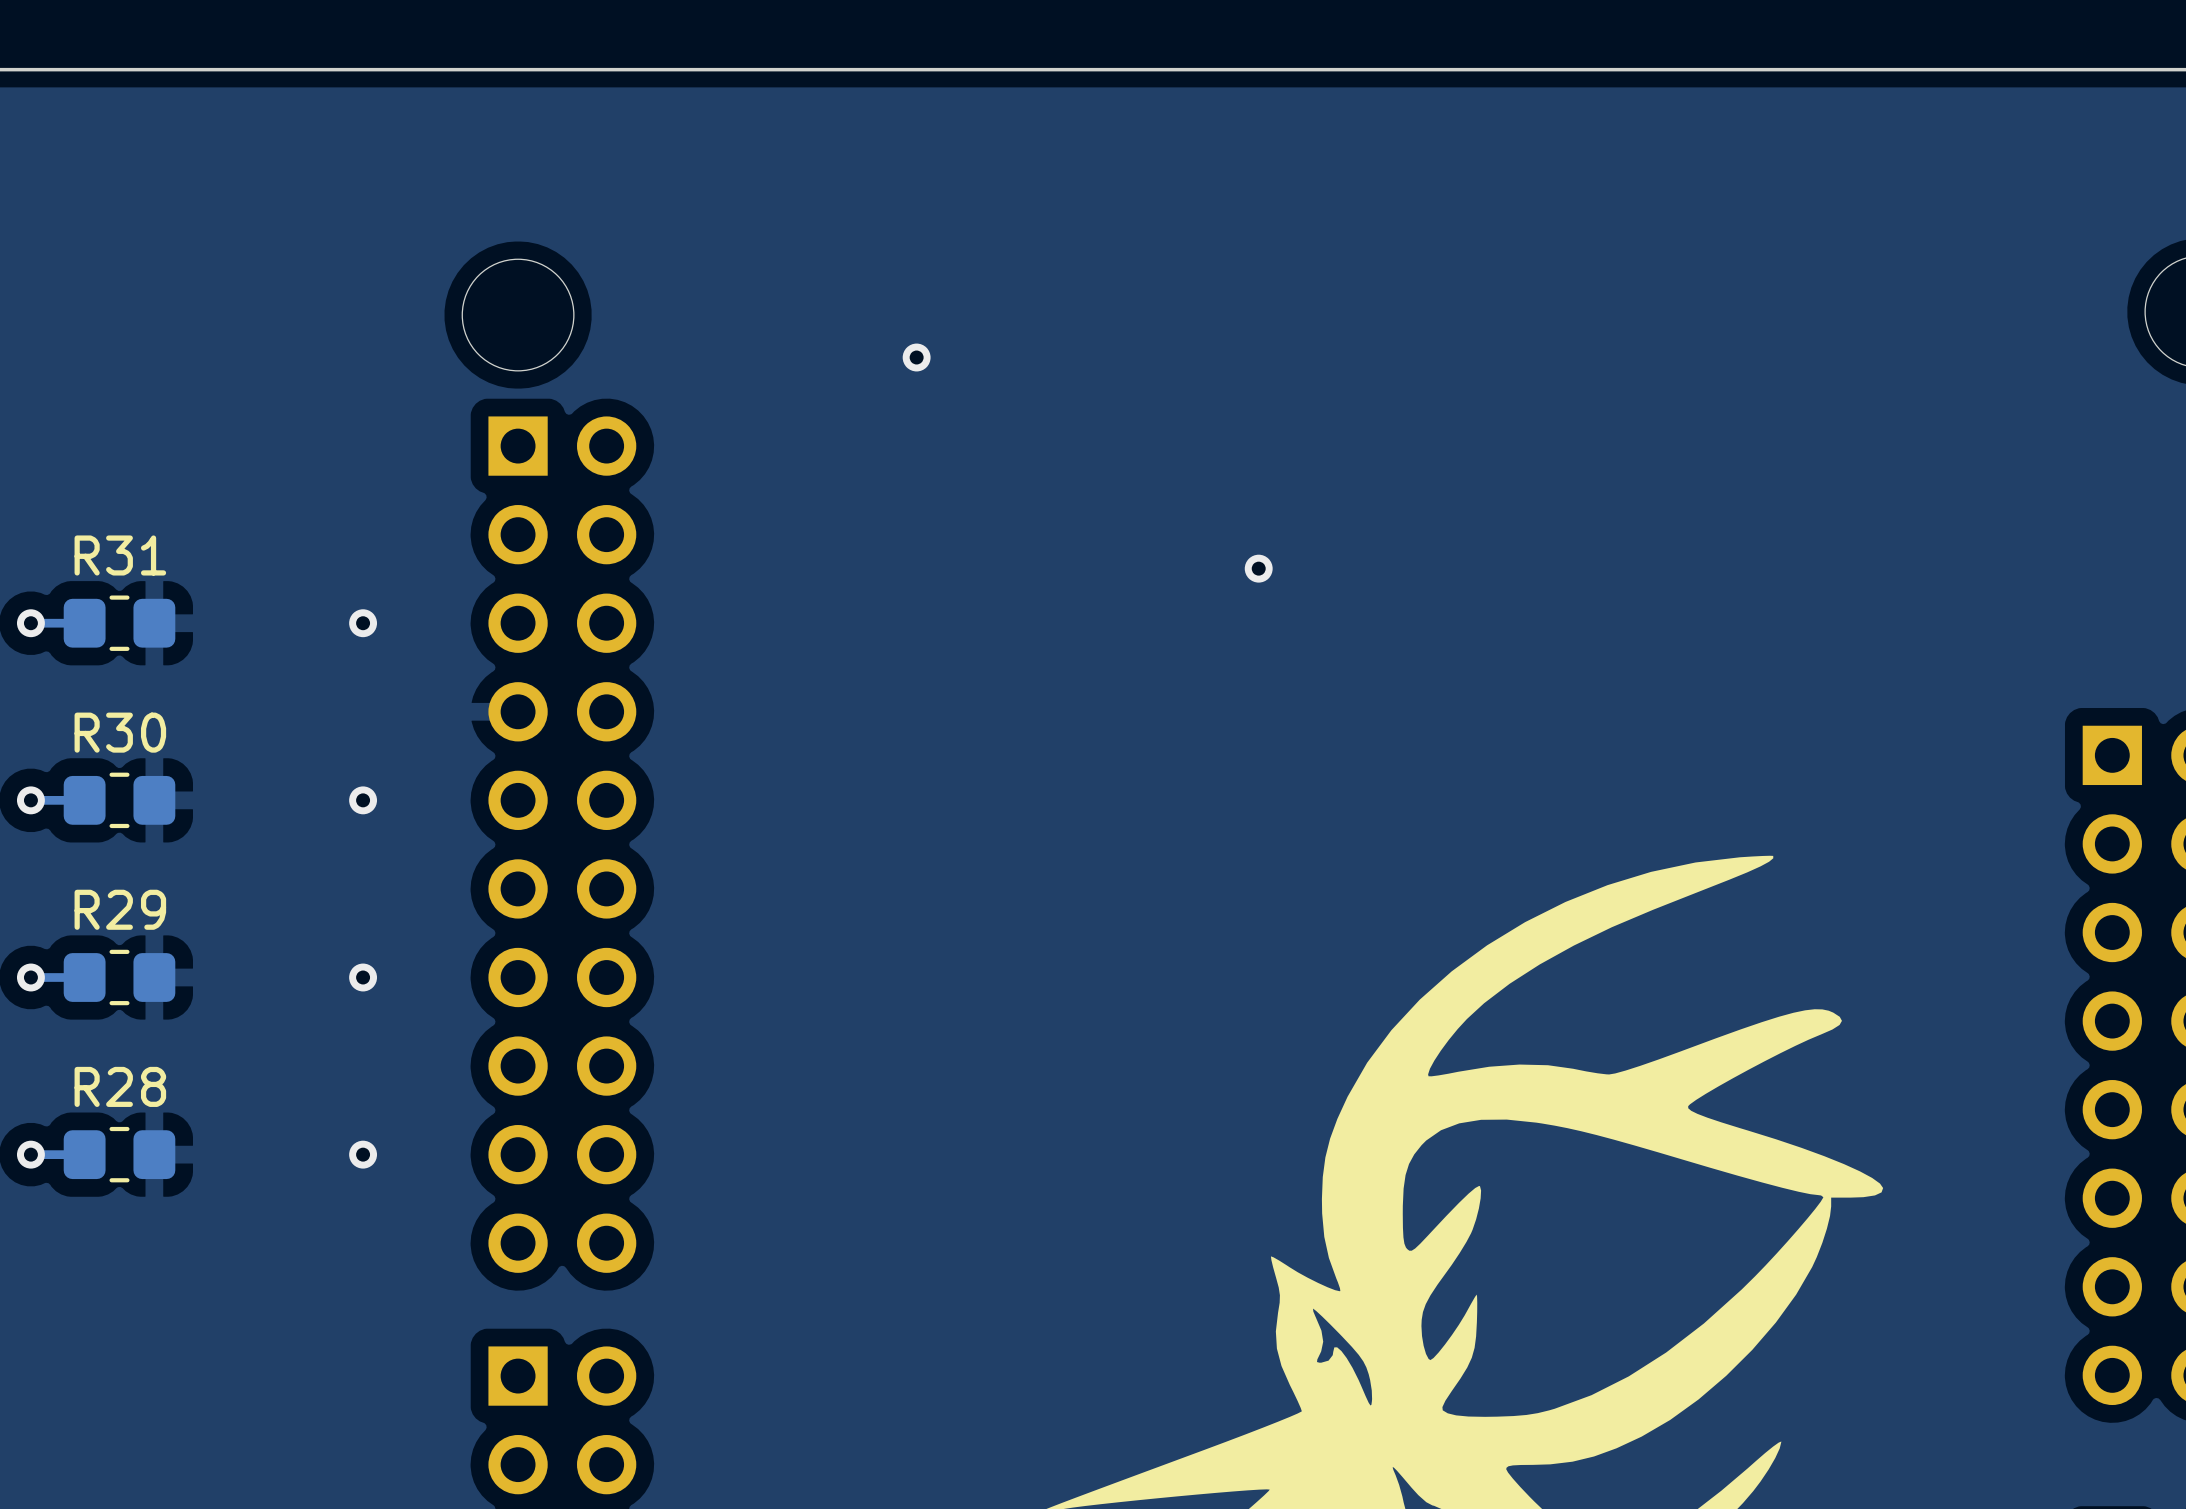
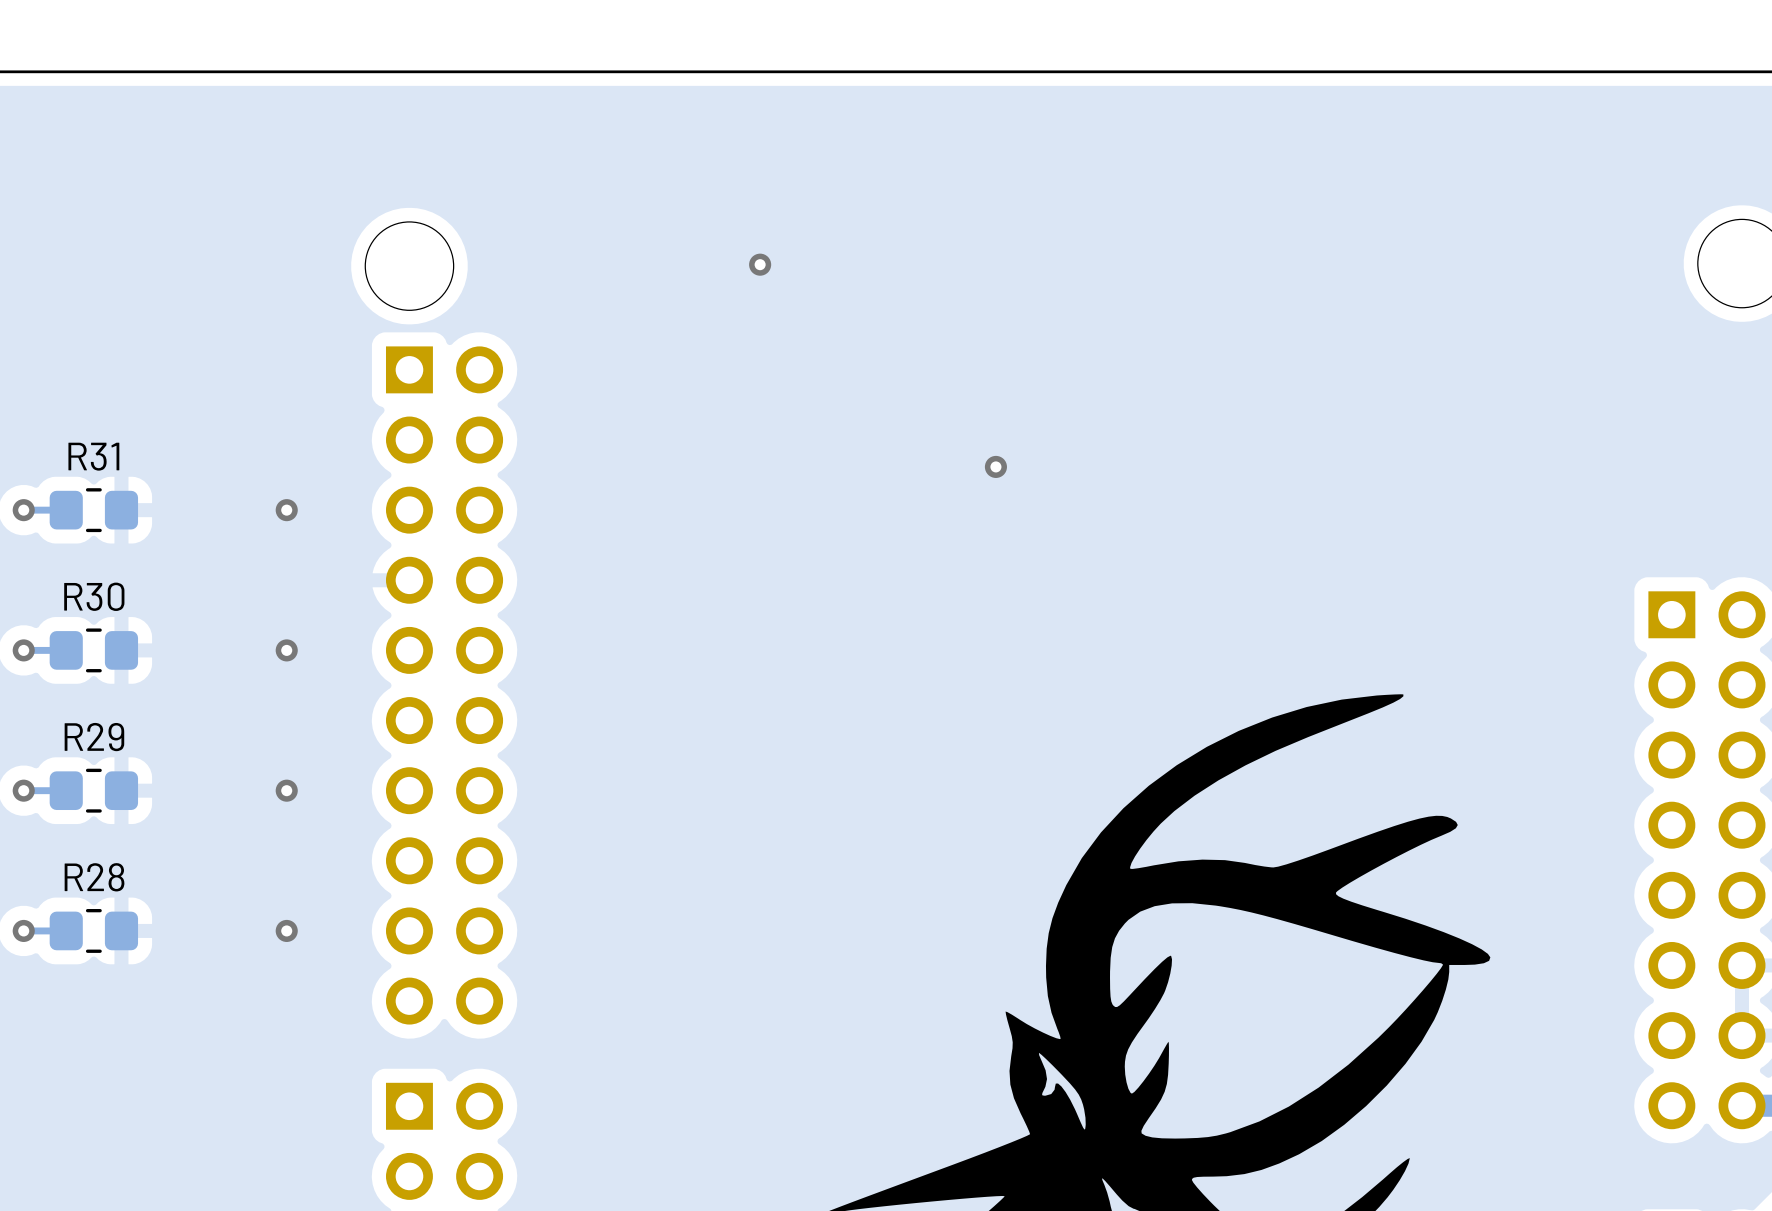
via position: (916, 357) -> (760, 264)

